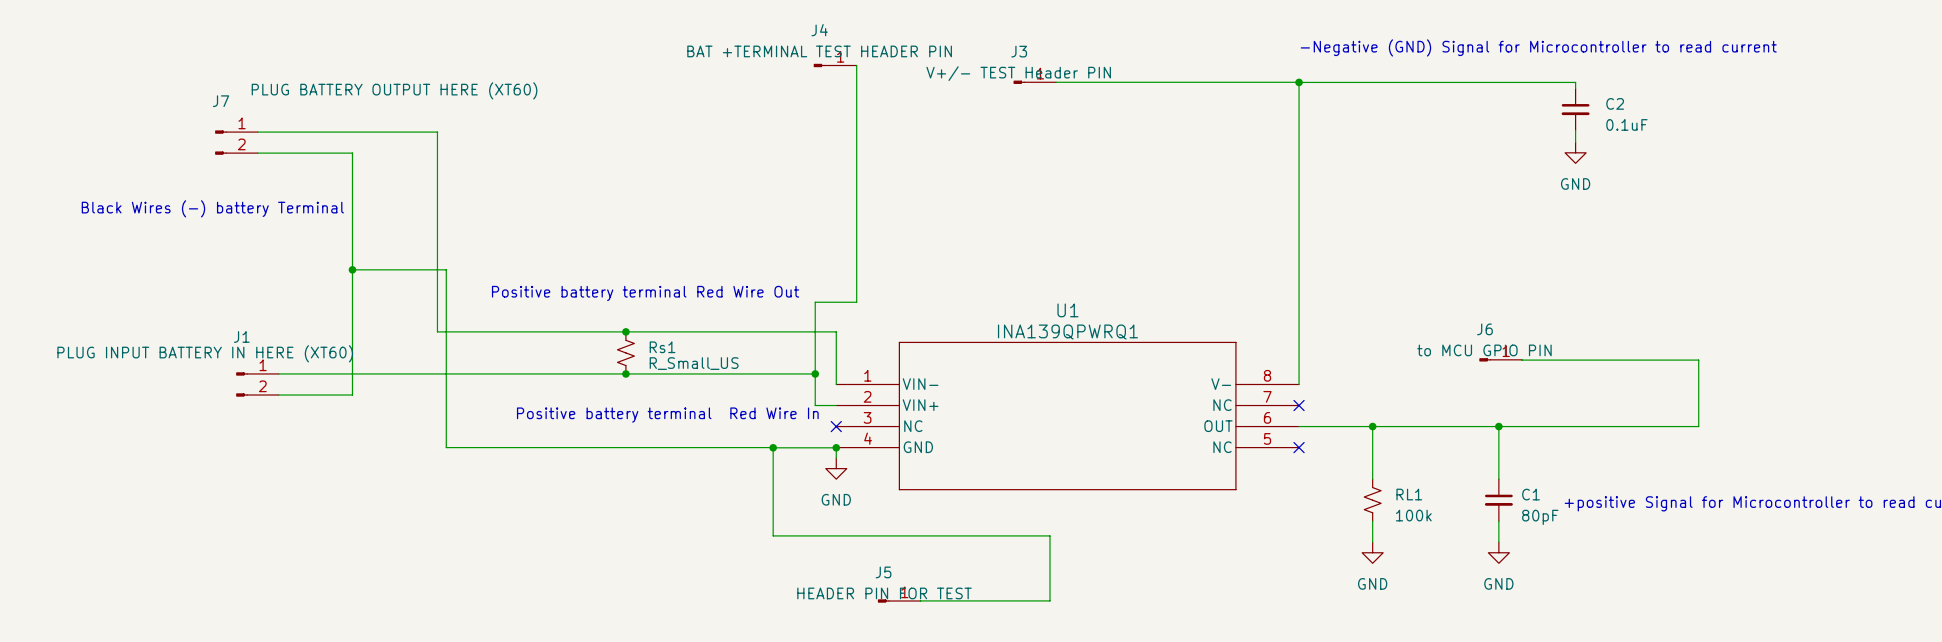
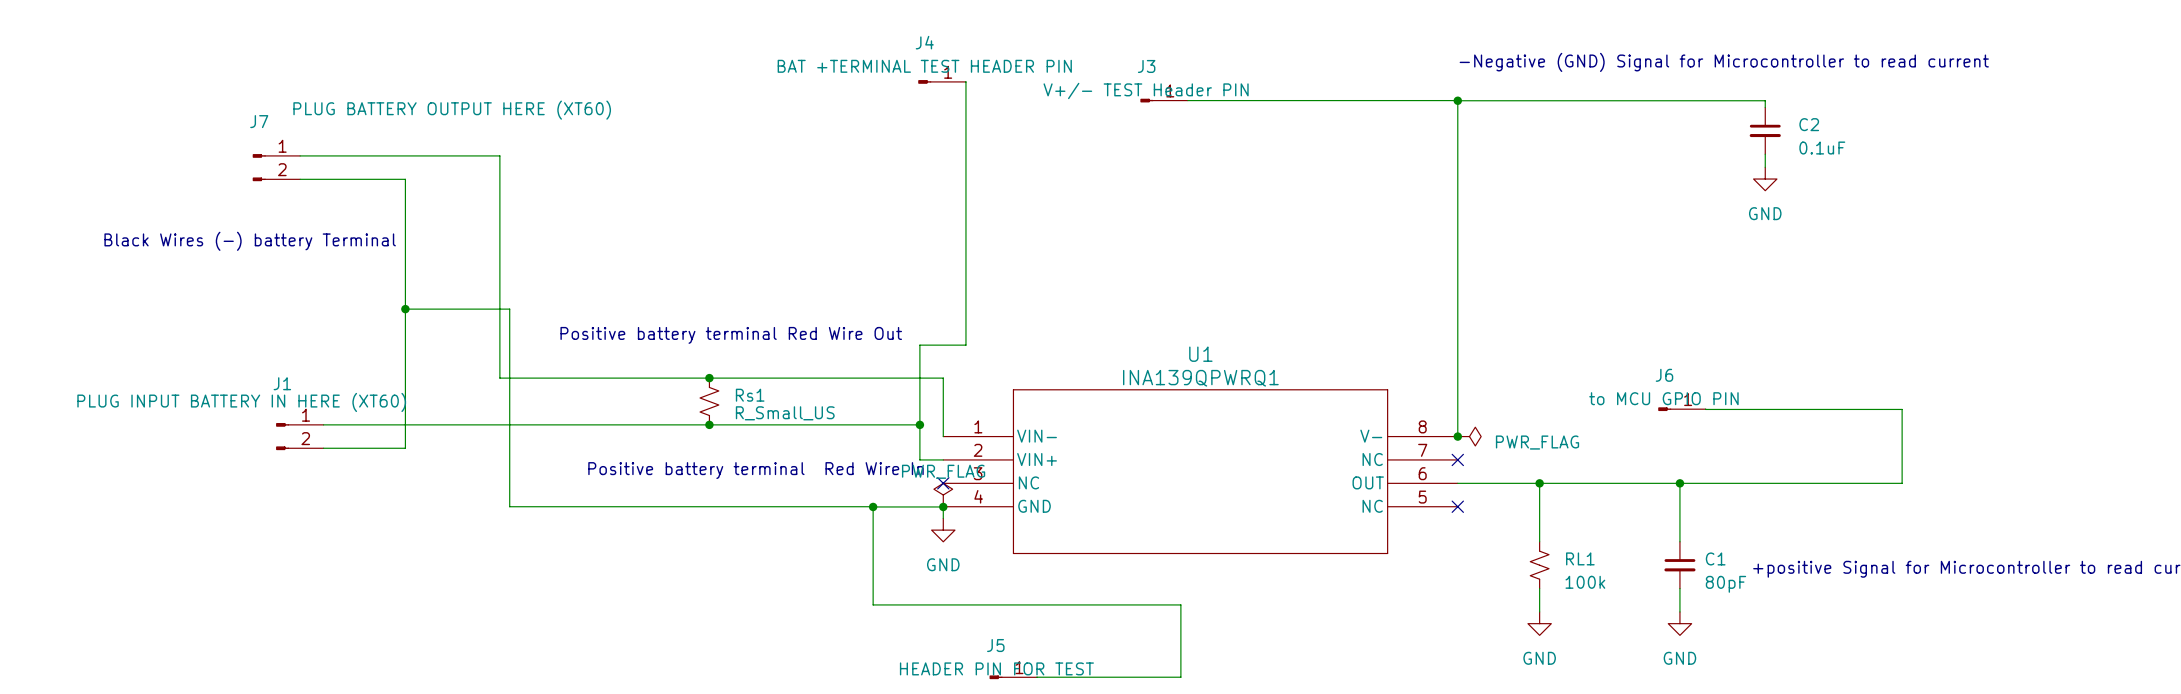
junction: none -> (1457, 436)
power symbol: none -> PWR_FLAG (1469, 436)
power symbol: none -> PWR_FLAG (943, 495)

